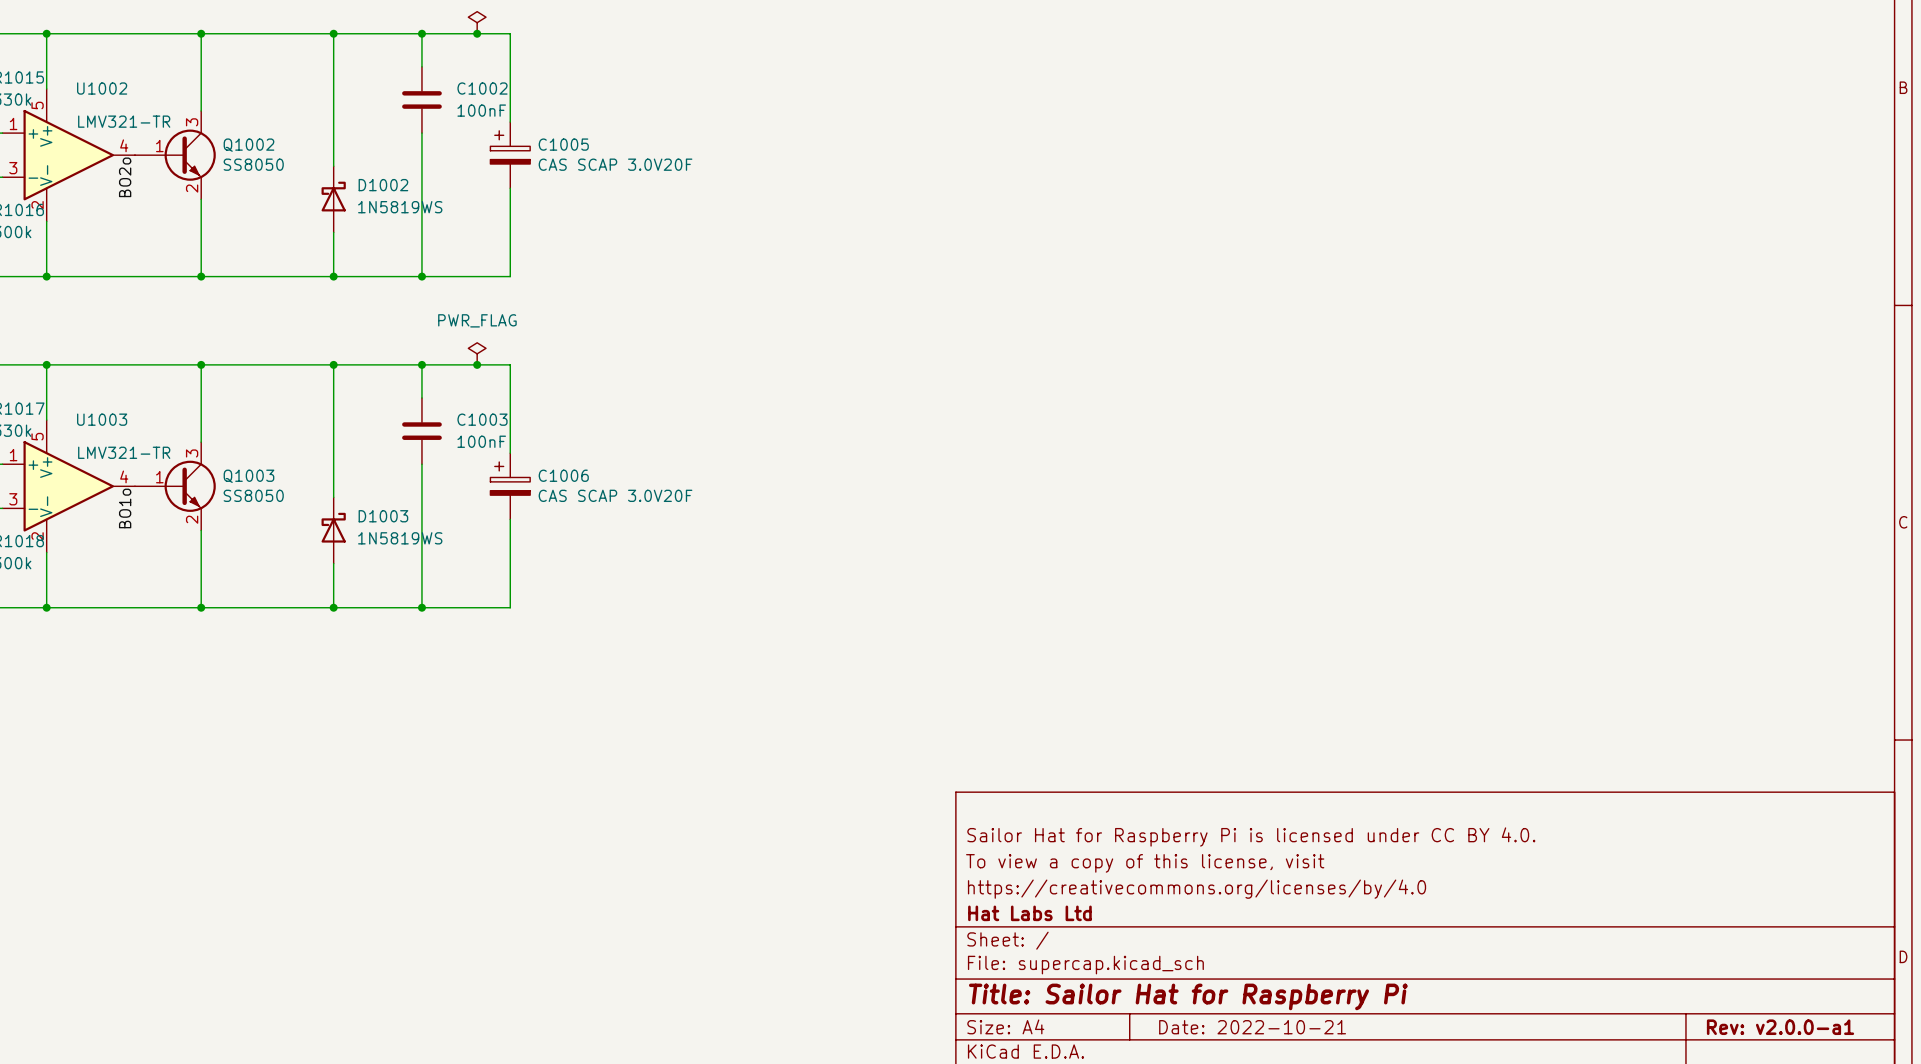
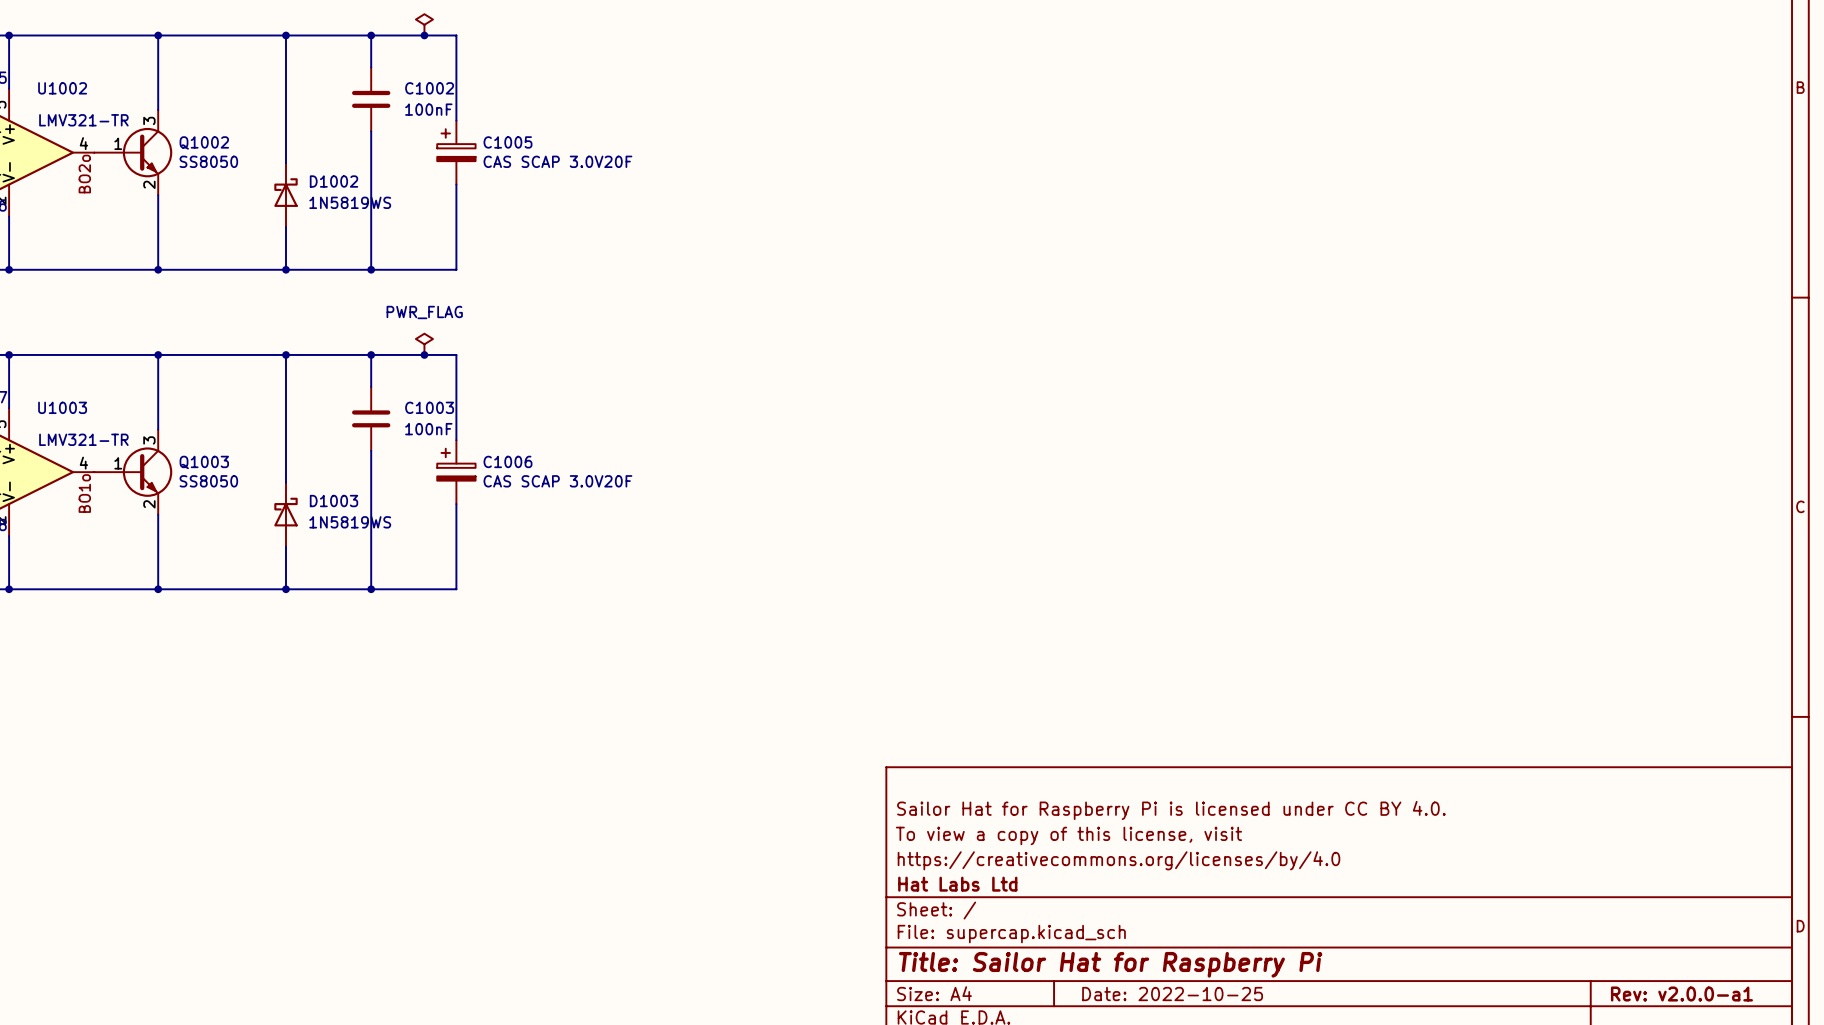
title block: Date: 2022-10-21 (1252, 1027) -> Date: 2022-10-25 (1172, 994)

